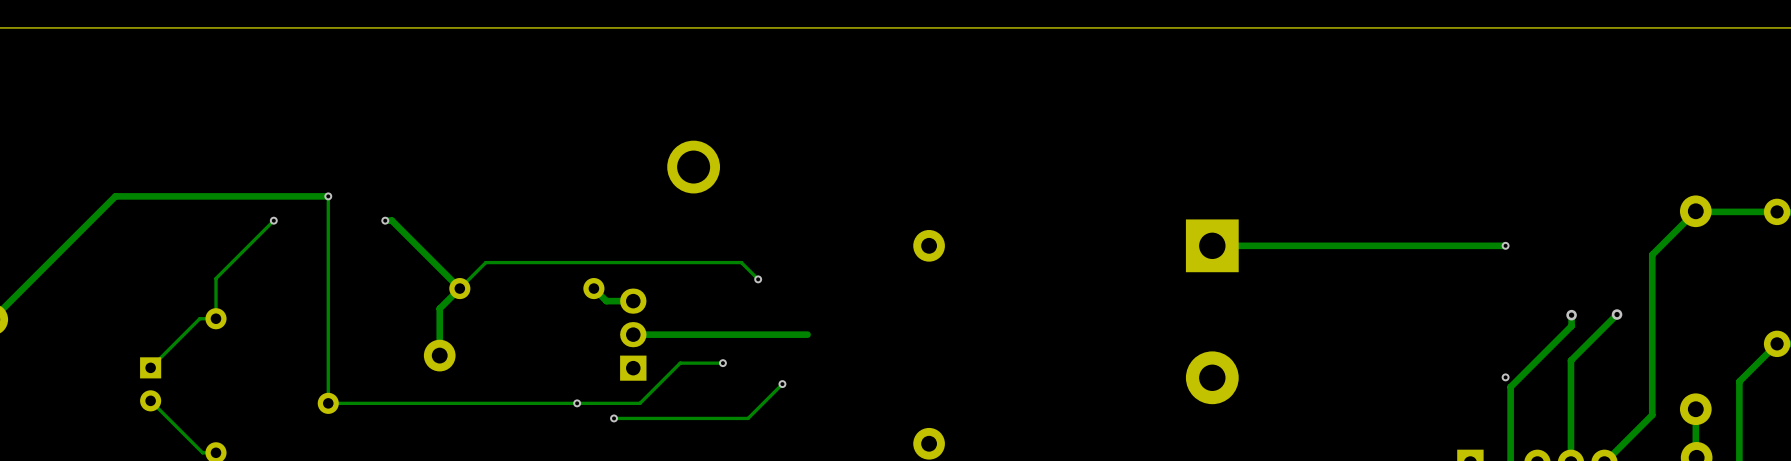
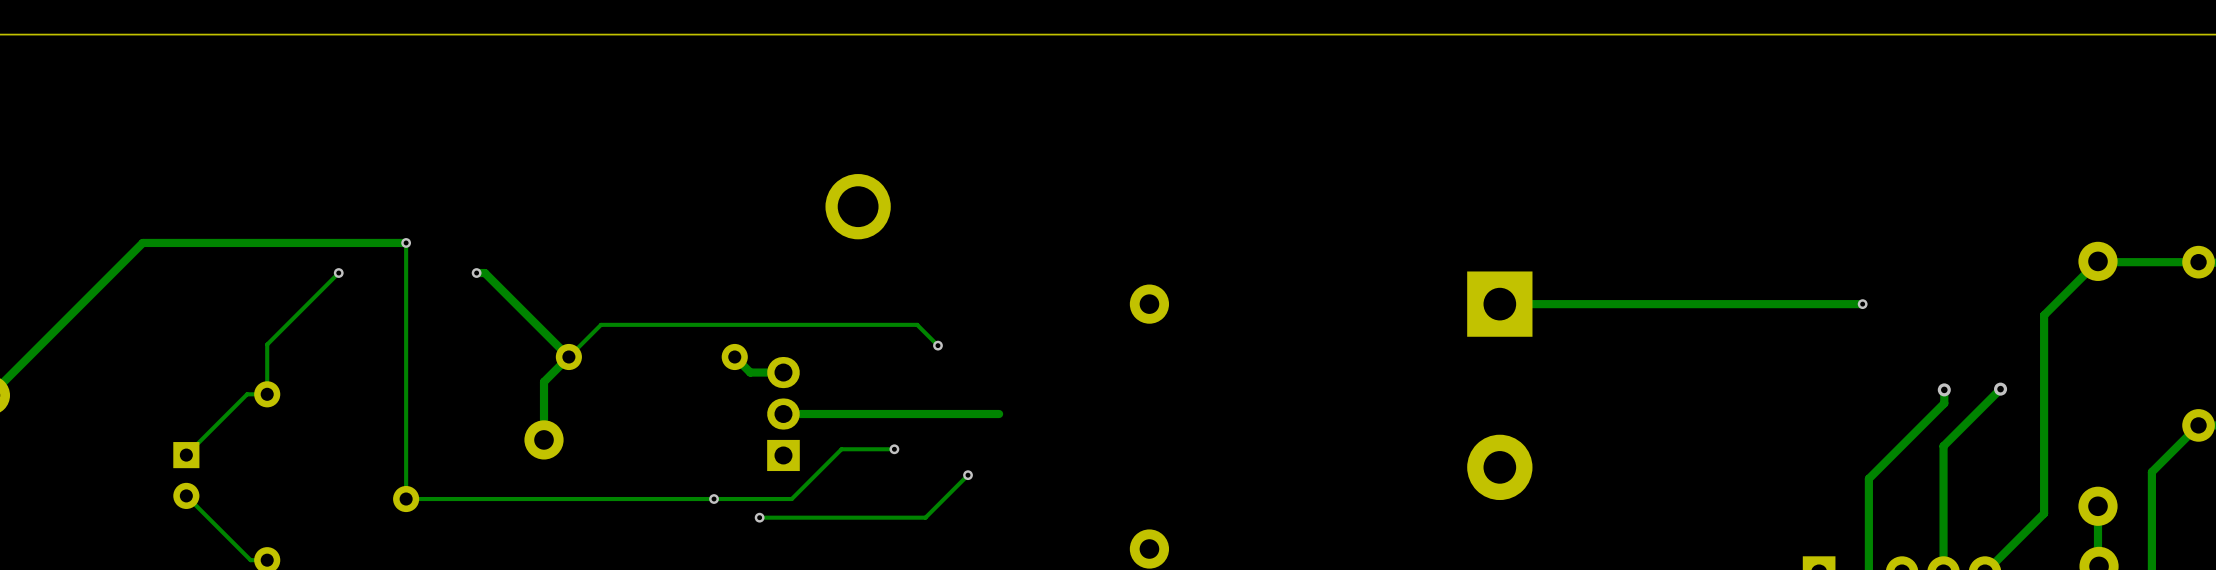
via: (1505, 377) -> none

